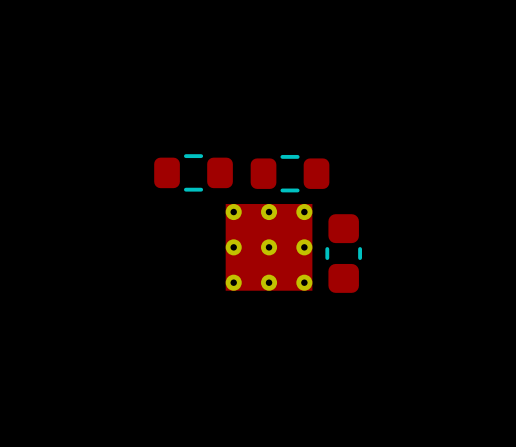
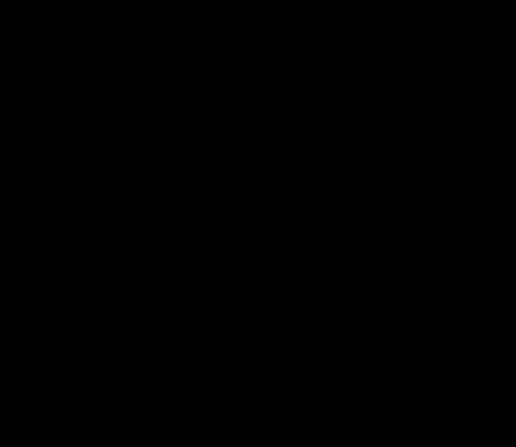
part: (193, 172) -> none
part: (290, 173) -> none
part: (269, 247) -> none
part: (343, 253) -> none

